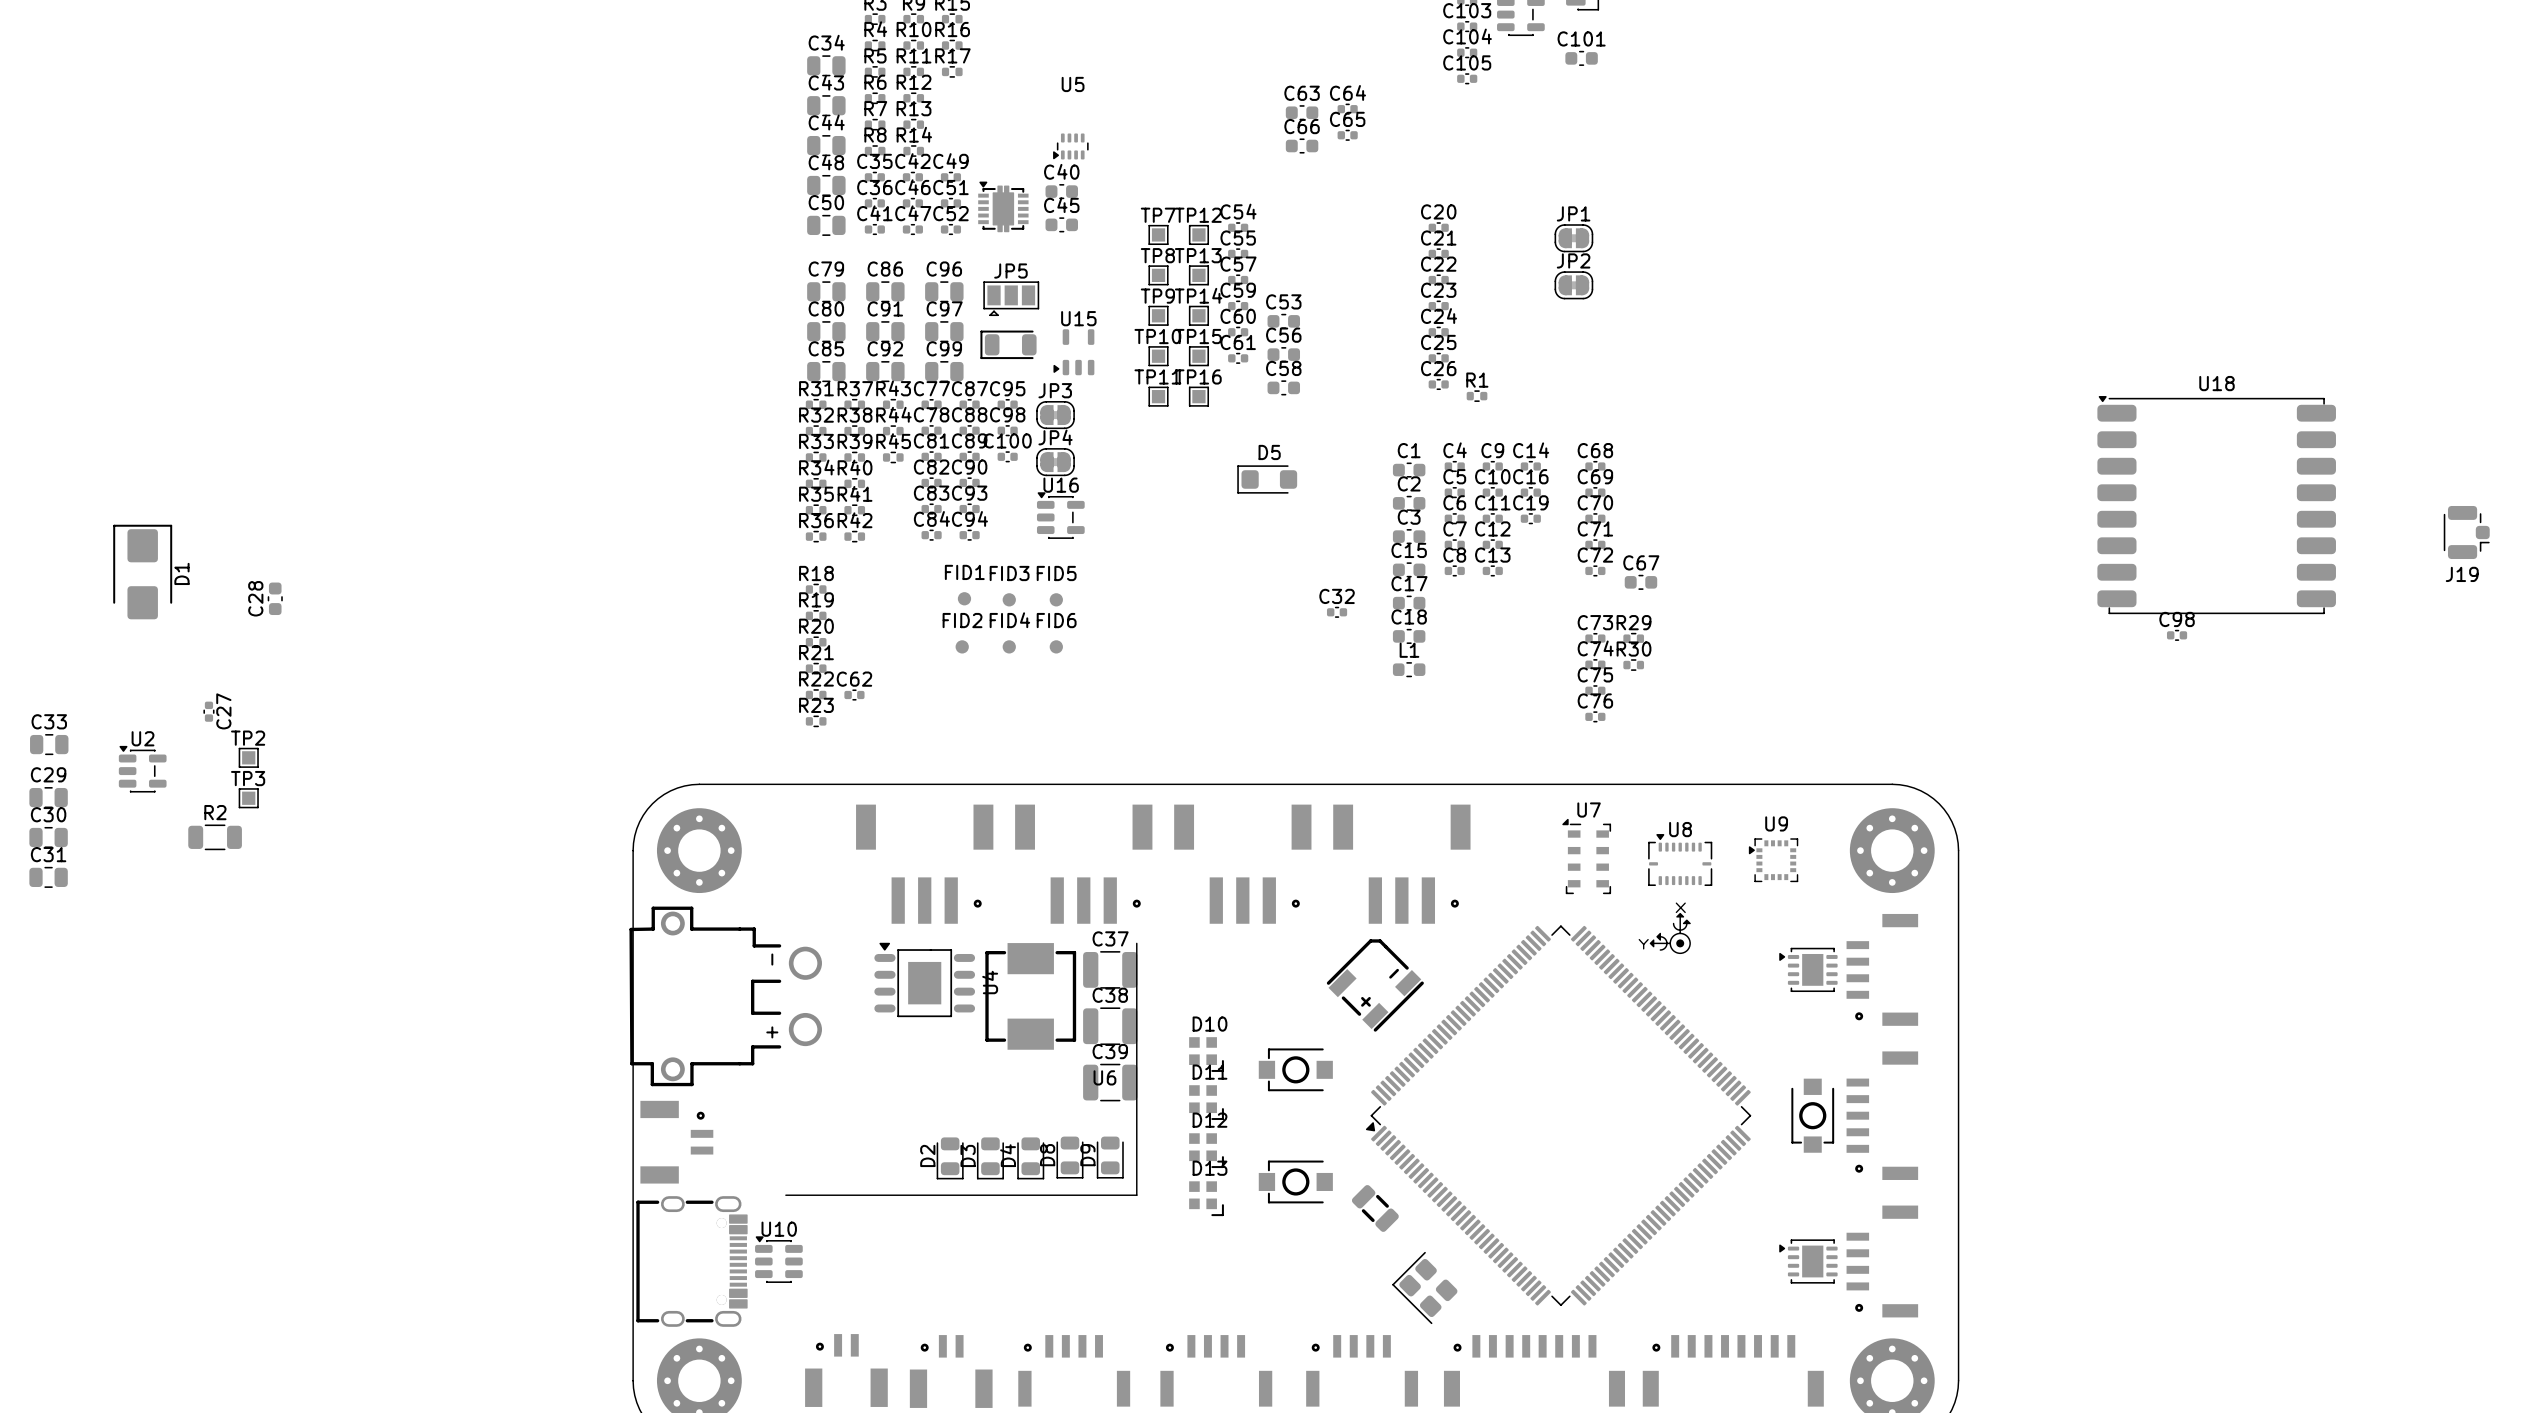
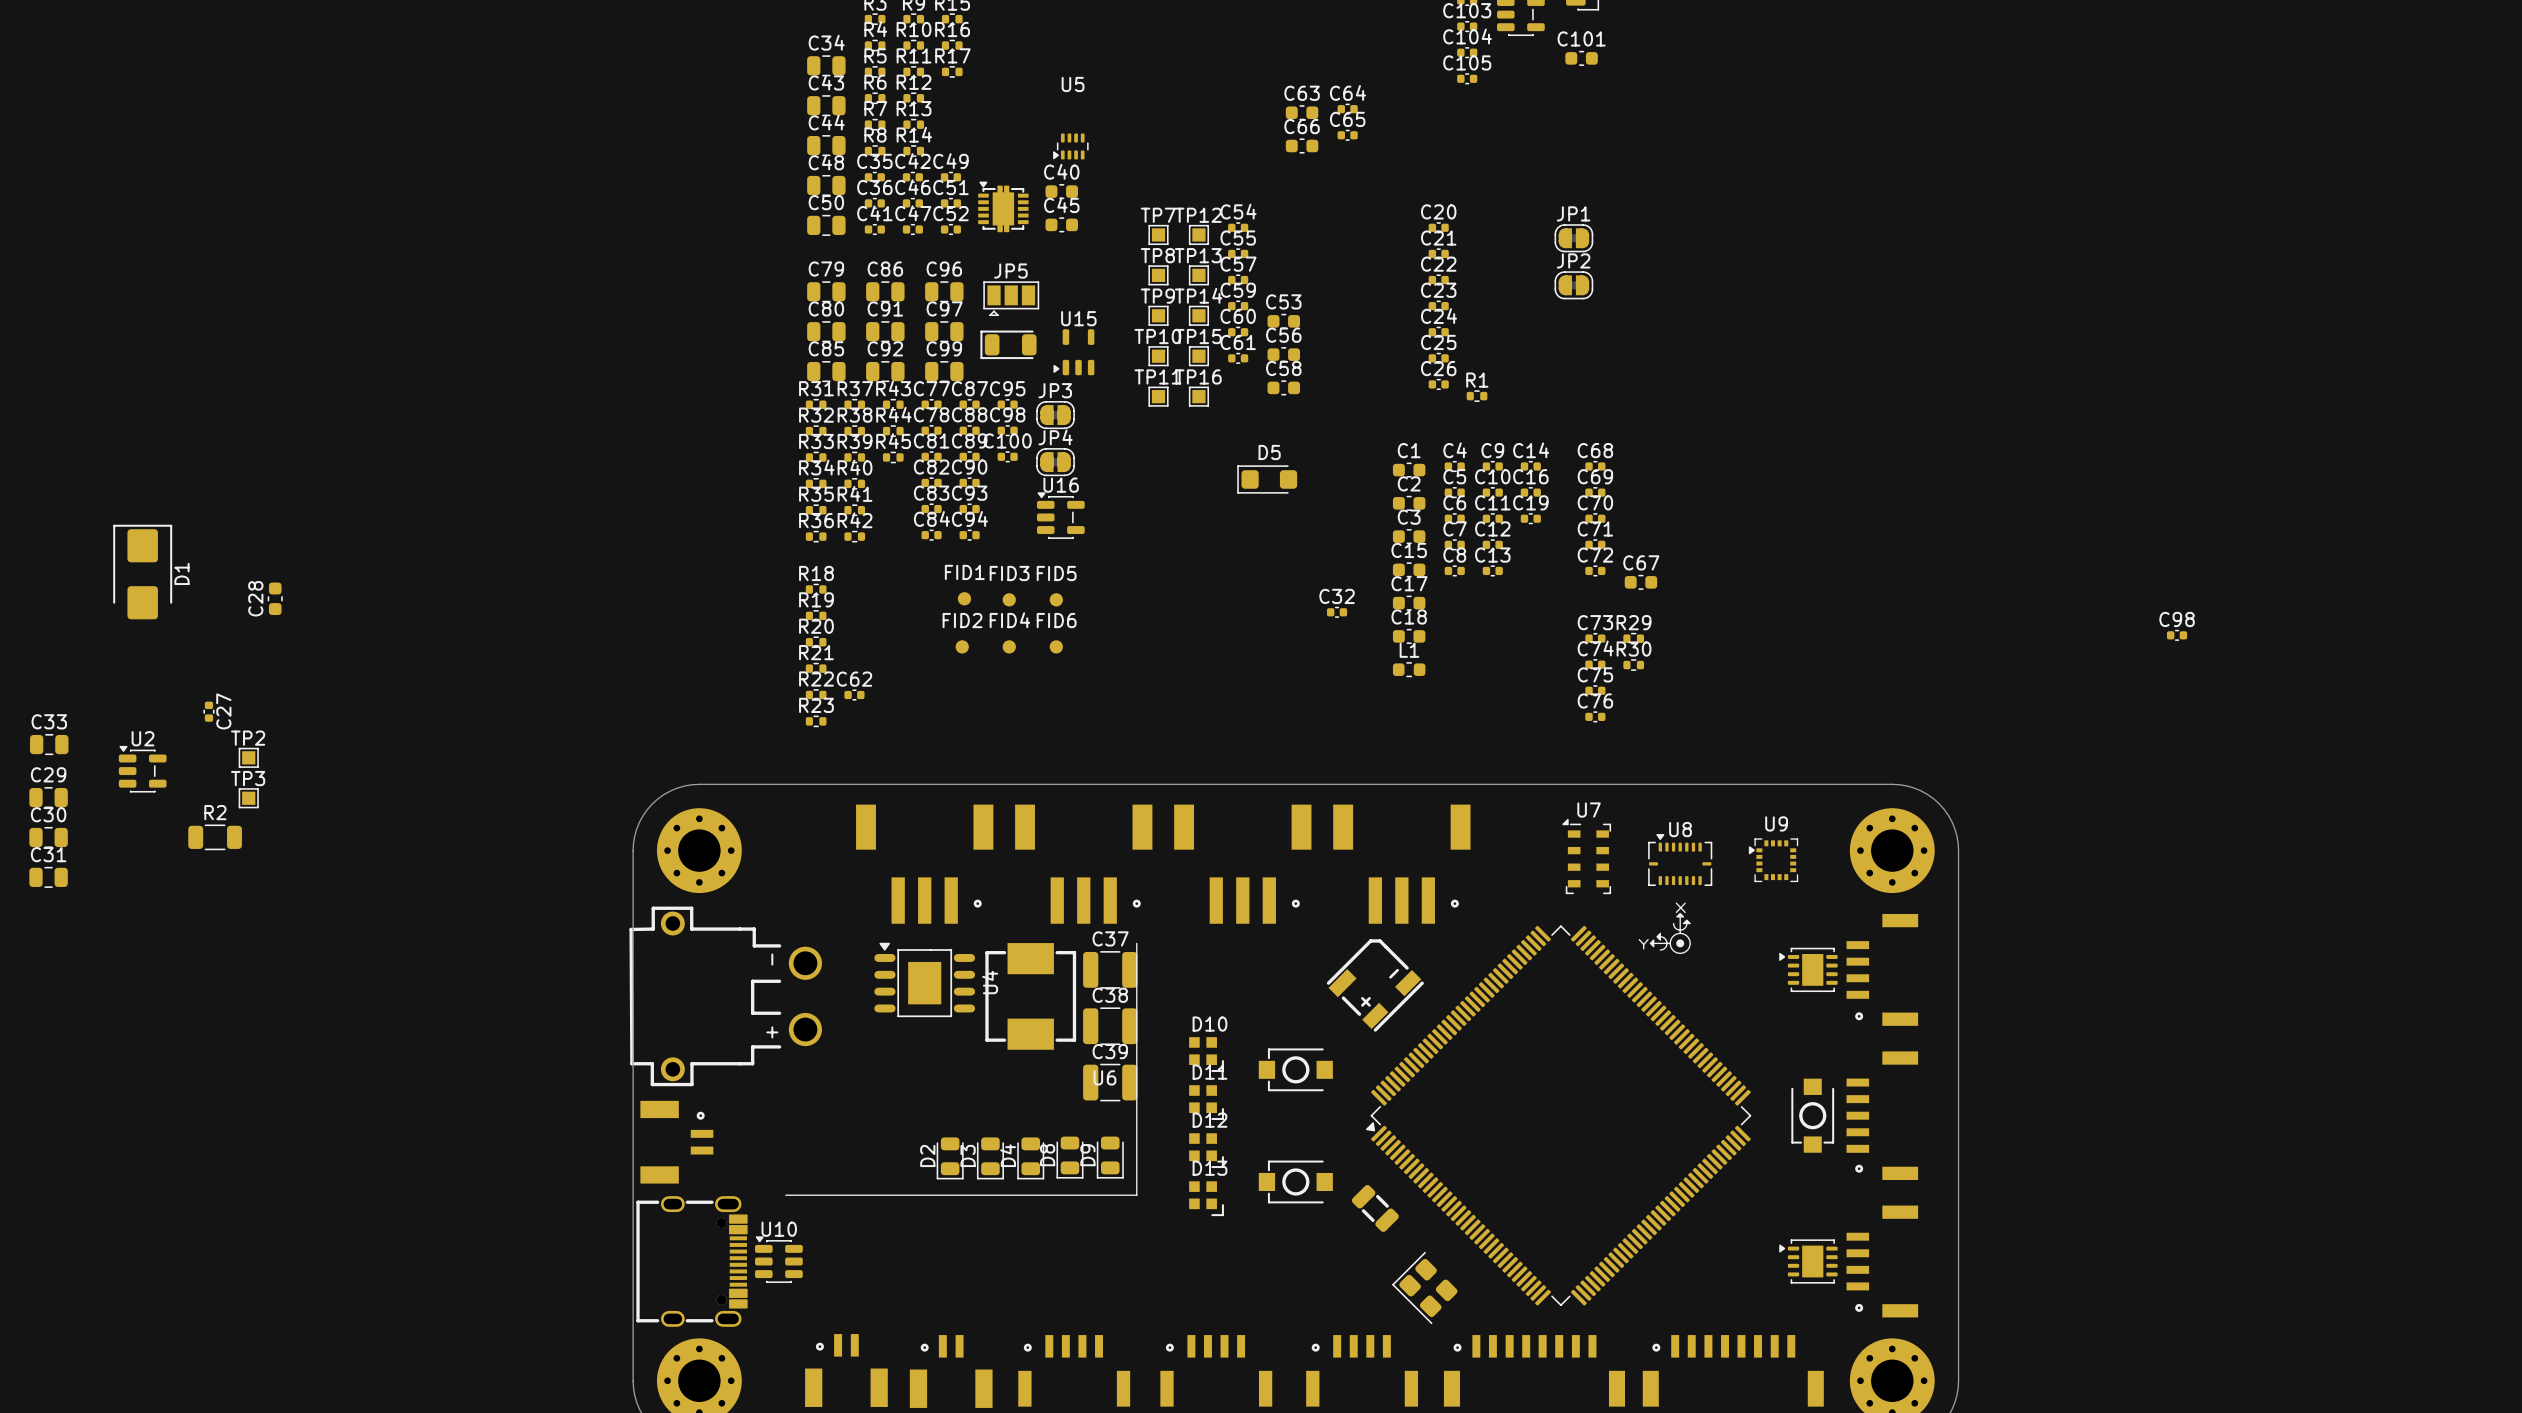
U18: (2216, 505) -> none
J19: (2466, 532) -> none

